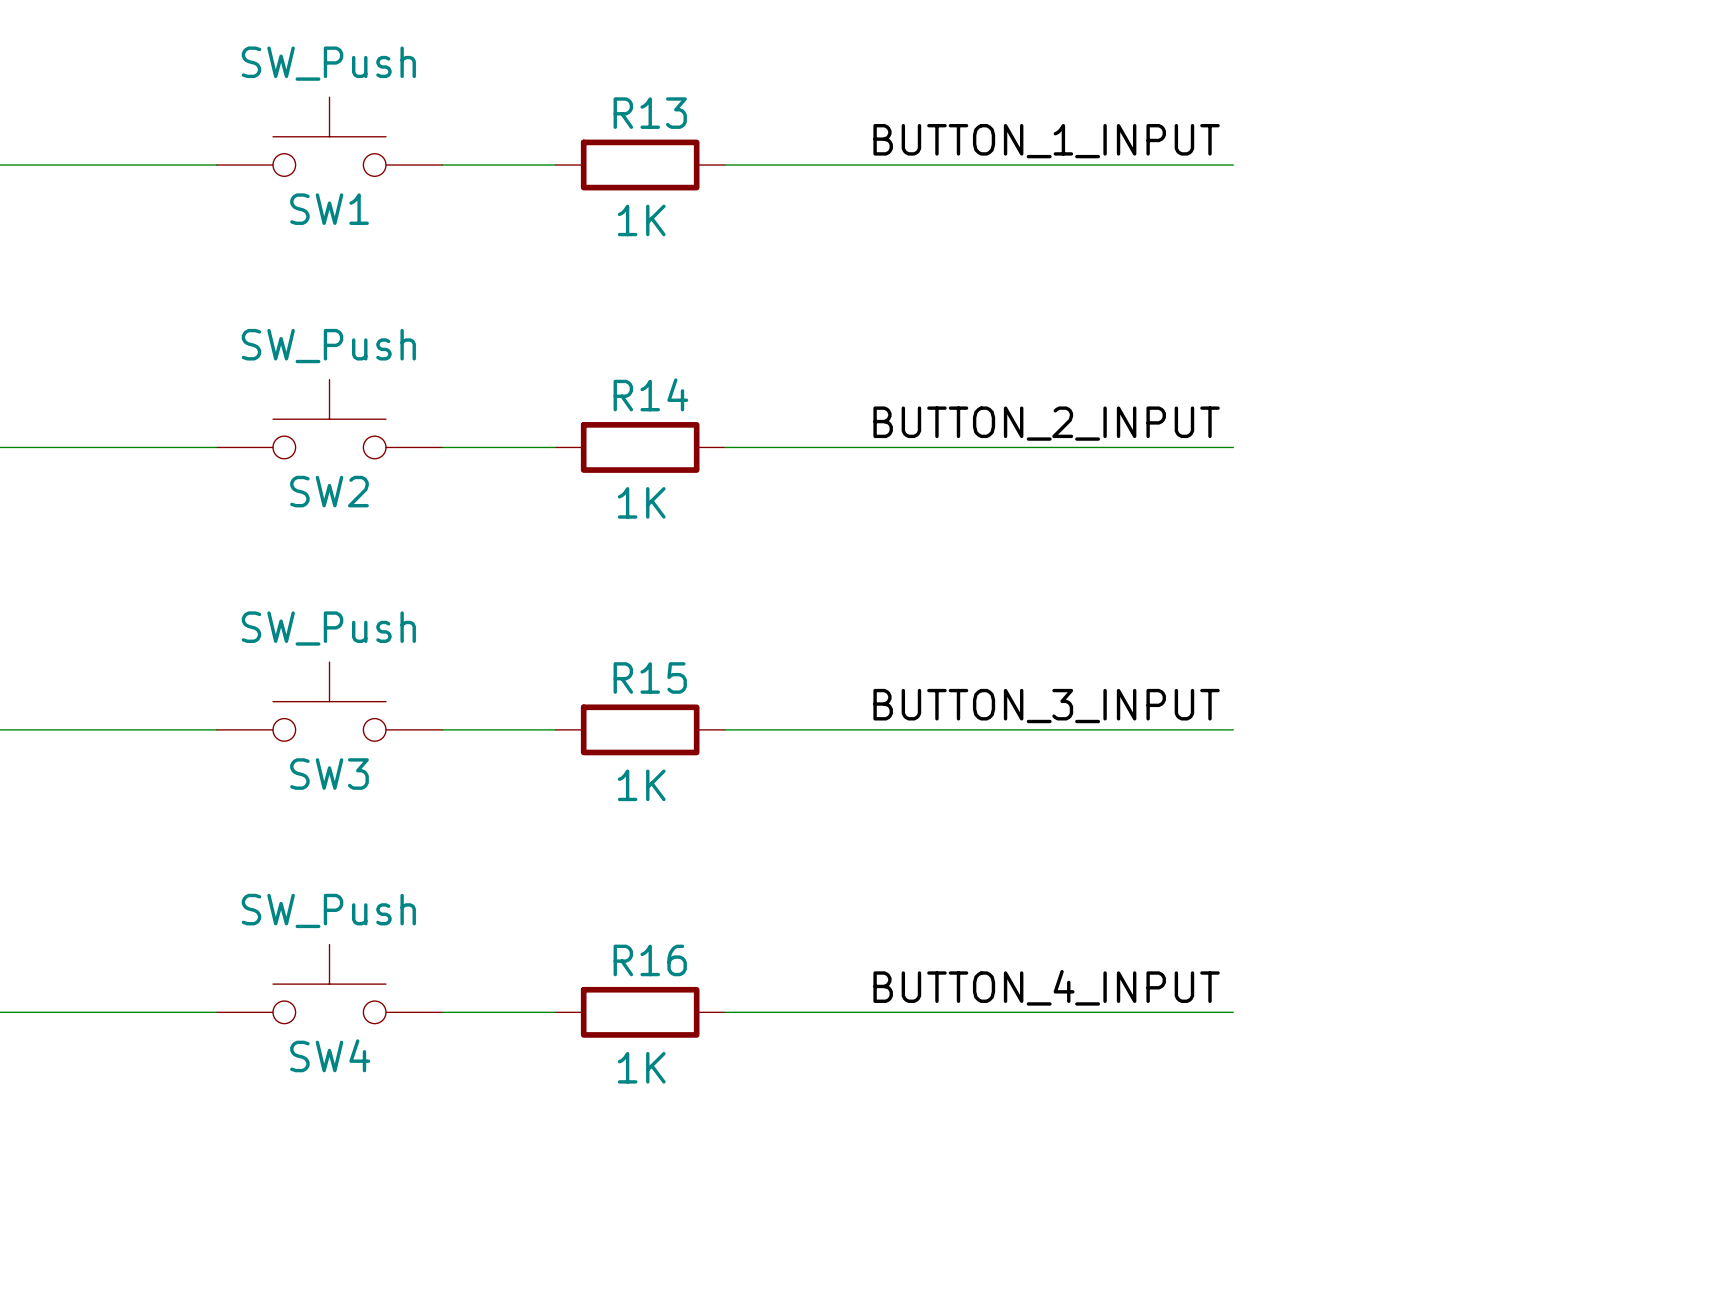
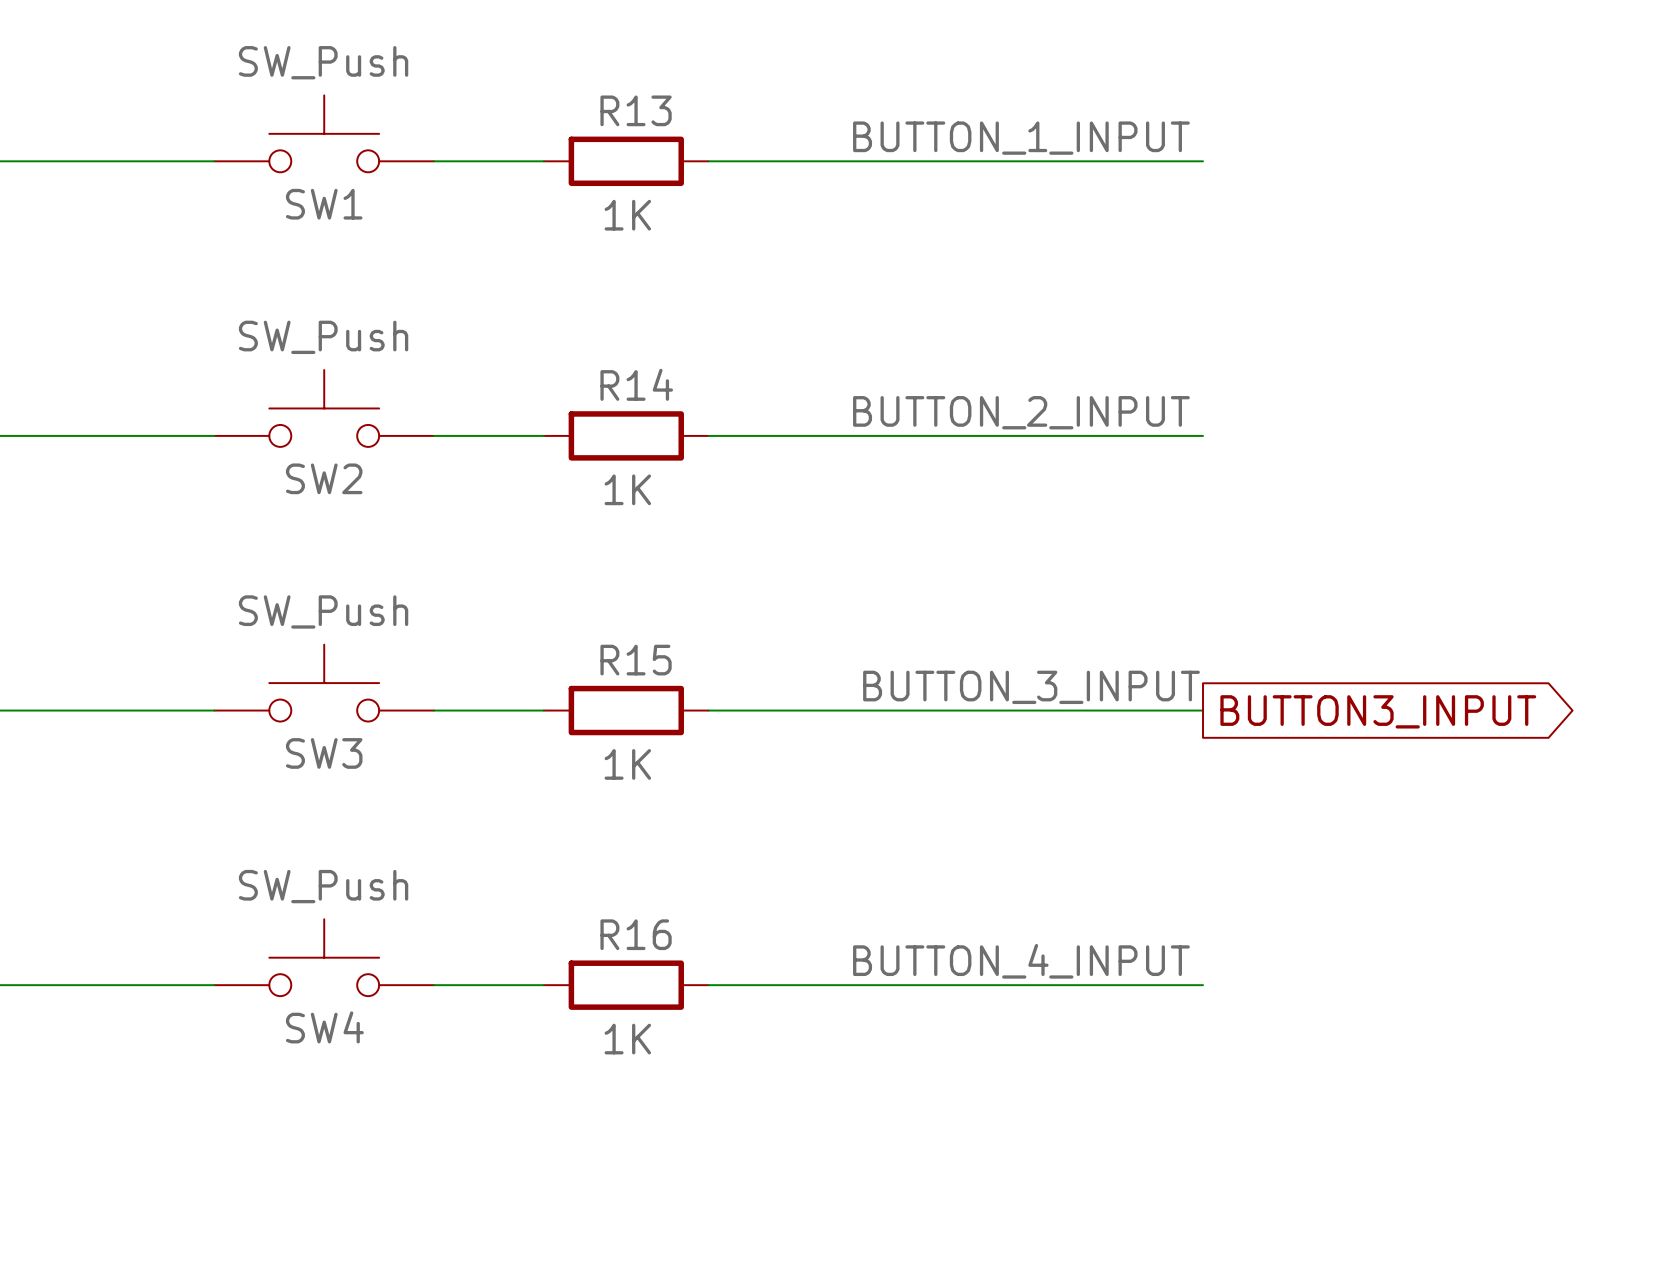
label position: BUTTON_3_INPUT (1046, 706) -> BUTTON_3_INPUT (1031, 687)
global label: none -> BUTTON3_INPUT (1378, 711)

